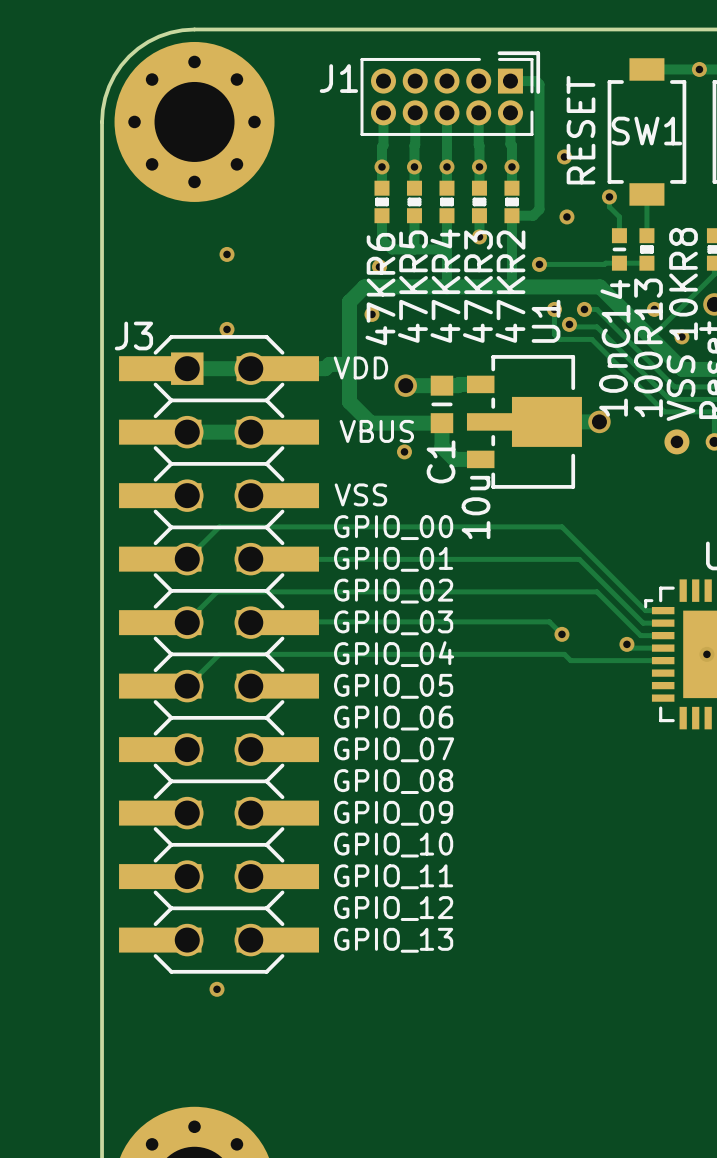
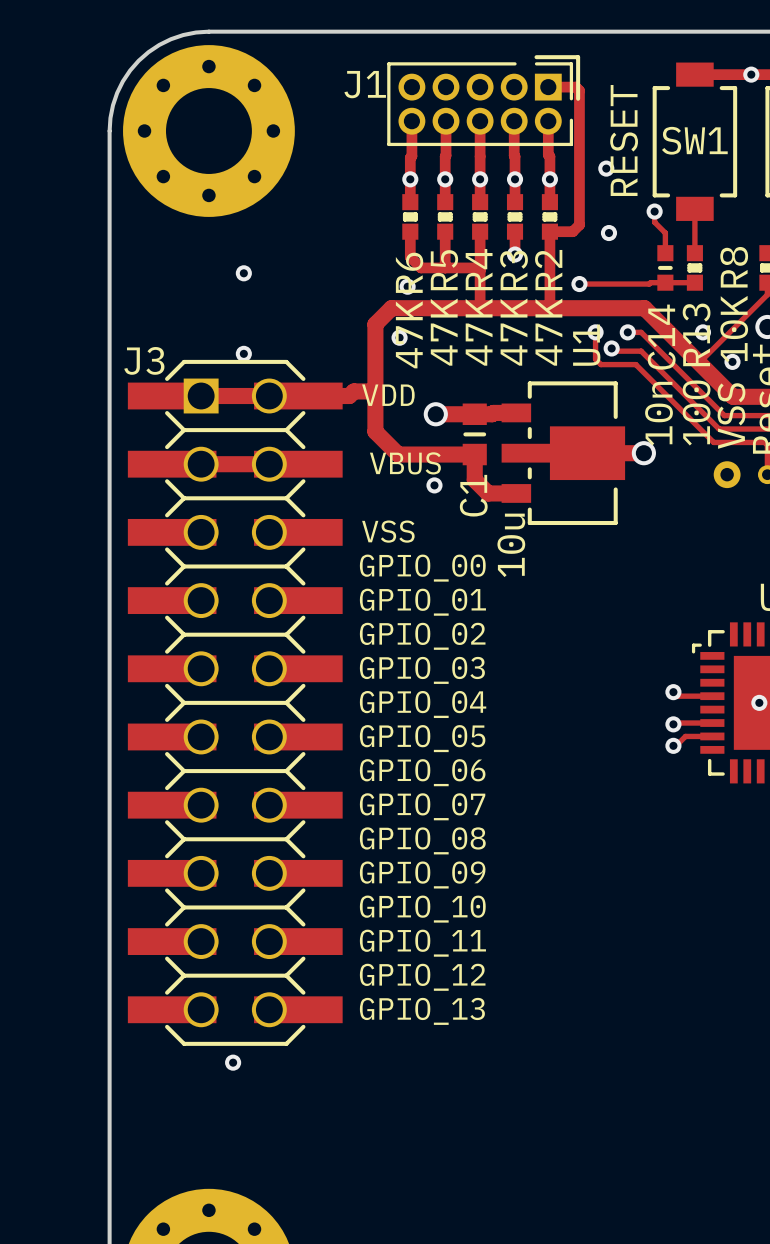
track: (187, 559) (219, 526) (561, 526) (645, 610) (663, 610) -> none
track: (277, 559) (579, 559) (643, 623) (663, 623) -> none
track: (252, 621) (549, 621) (561, 634) -> none
track: (184, 624) (217, 591) (596, 591) (640, 635) (663, 635) -> none
via: (561, 634) -> none
track: (663, 660) (570, 660) (564, 654) (219, 654) (187, 686) -> none
track: none -> (712, 723) (673, 724)
via: none -> (673, 724)
track: none -> (712, 736) (685, 736) (676, 745) (673, 745)
via: none -> (673, 745)

